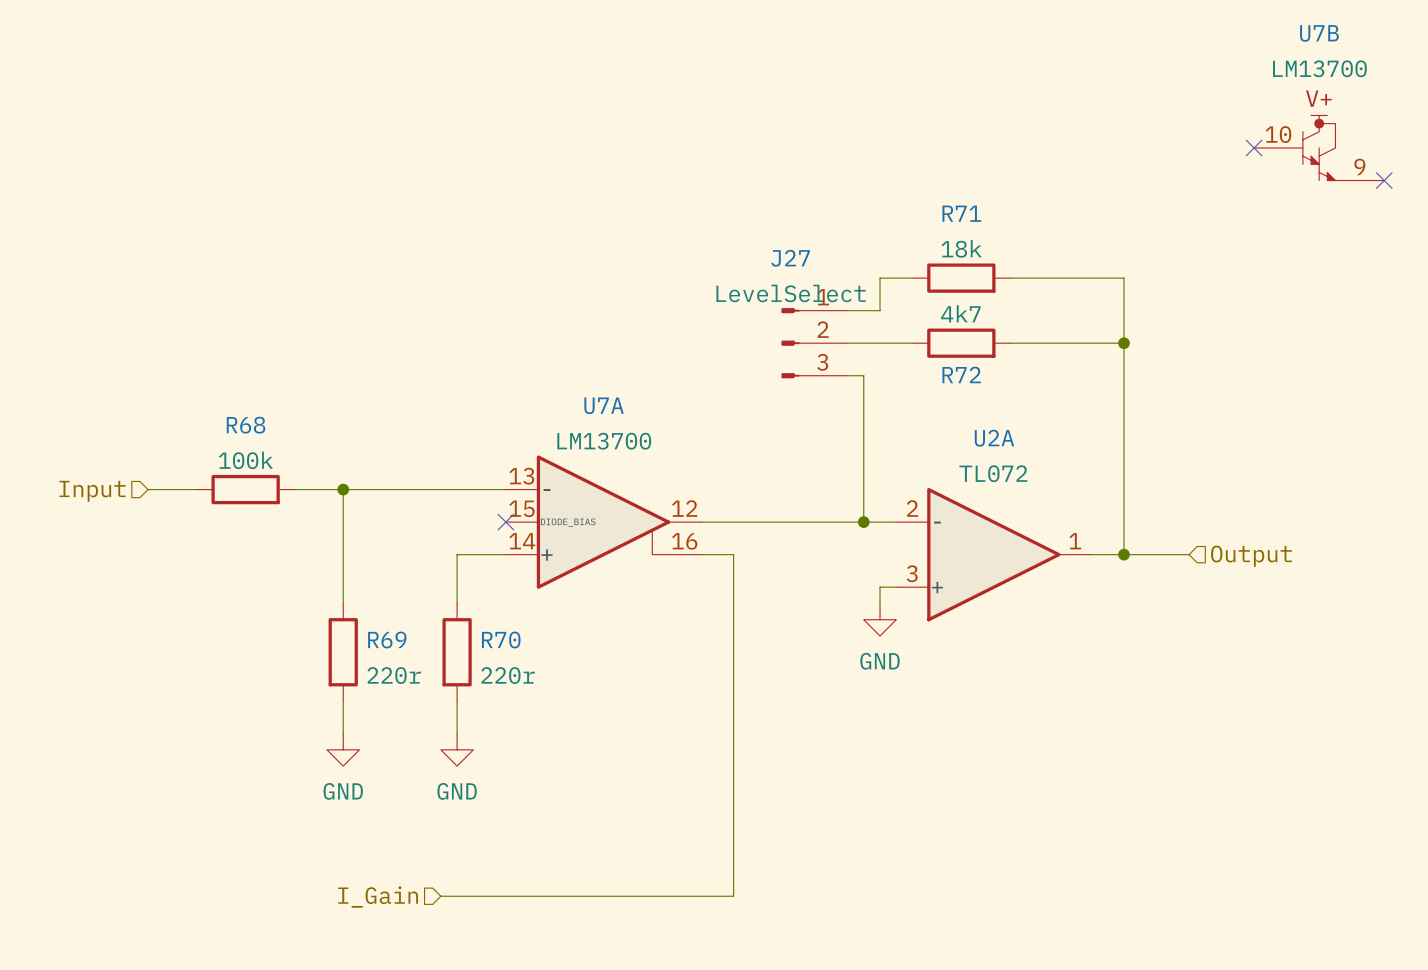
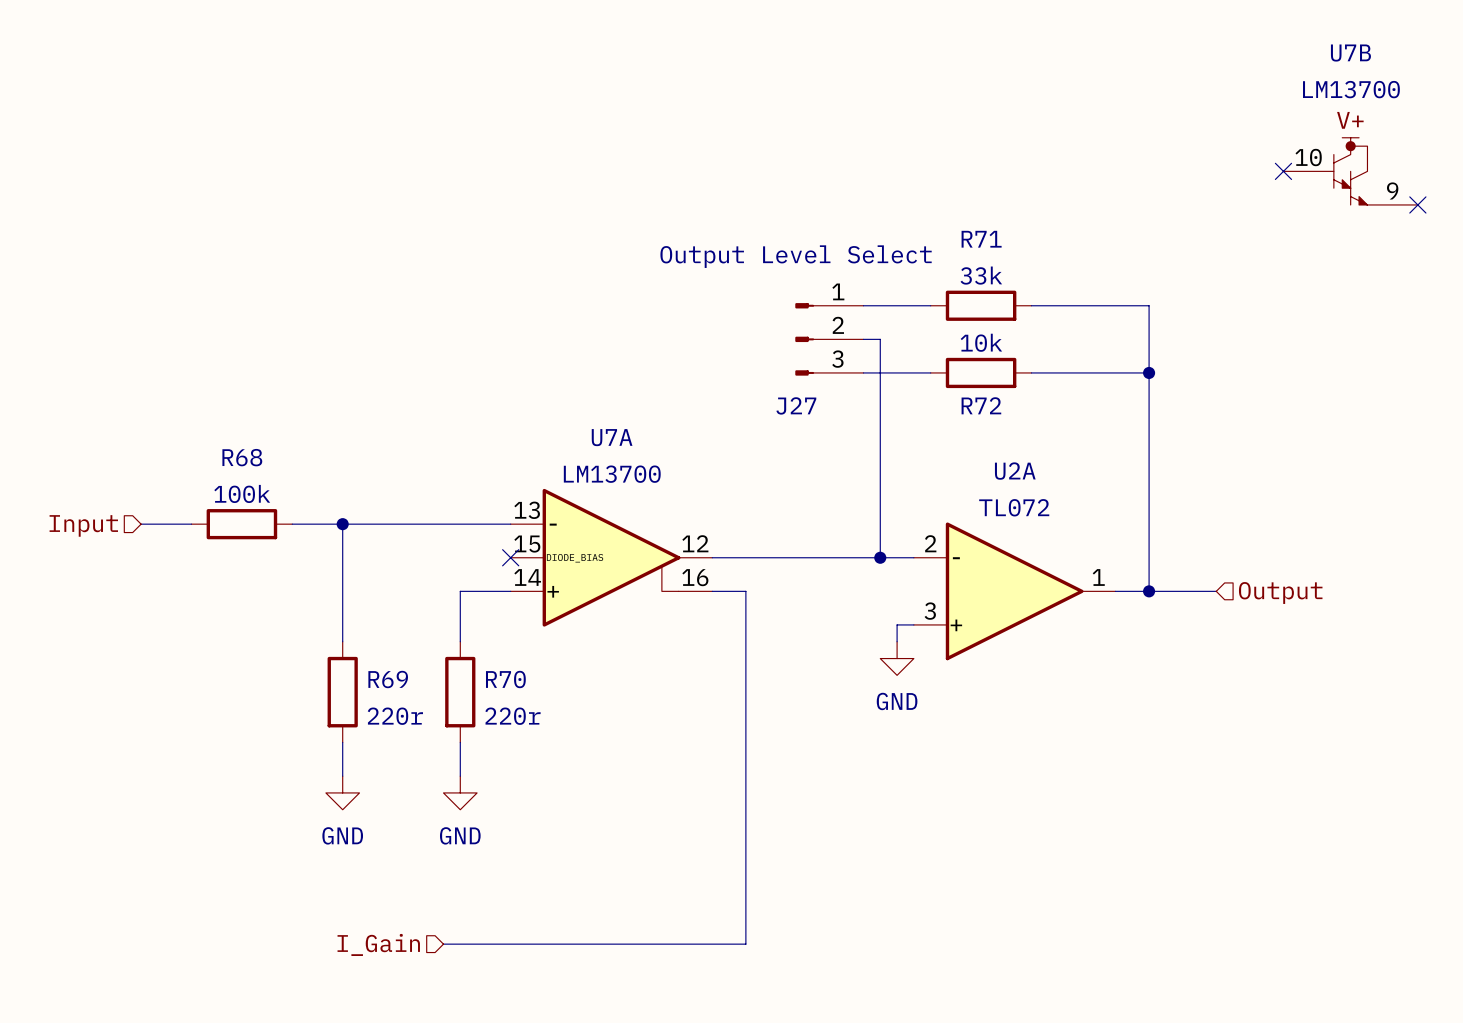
J27 text: none -> Output Level Select (796, 256)
R71 value: 18k (961, 248) -> 33k (981, 275)
J27 name position: J27 (790, 258) -> J27 (796, 405)
wire: (880, 278) (880, 310) (863, 310) -> (897, 305) (863, 305)
J27 value: LevelSelect (791, 293) -> none
R72 value: 4k7 (960, 313) -> 10k (981, 342)
J27 position: (814, 343) -> (829, 339)
wire: (847, 375) (863, 375) -> (880, 339) (880, 406)

